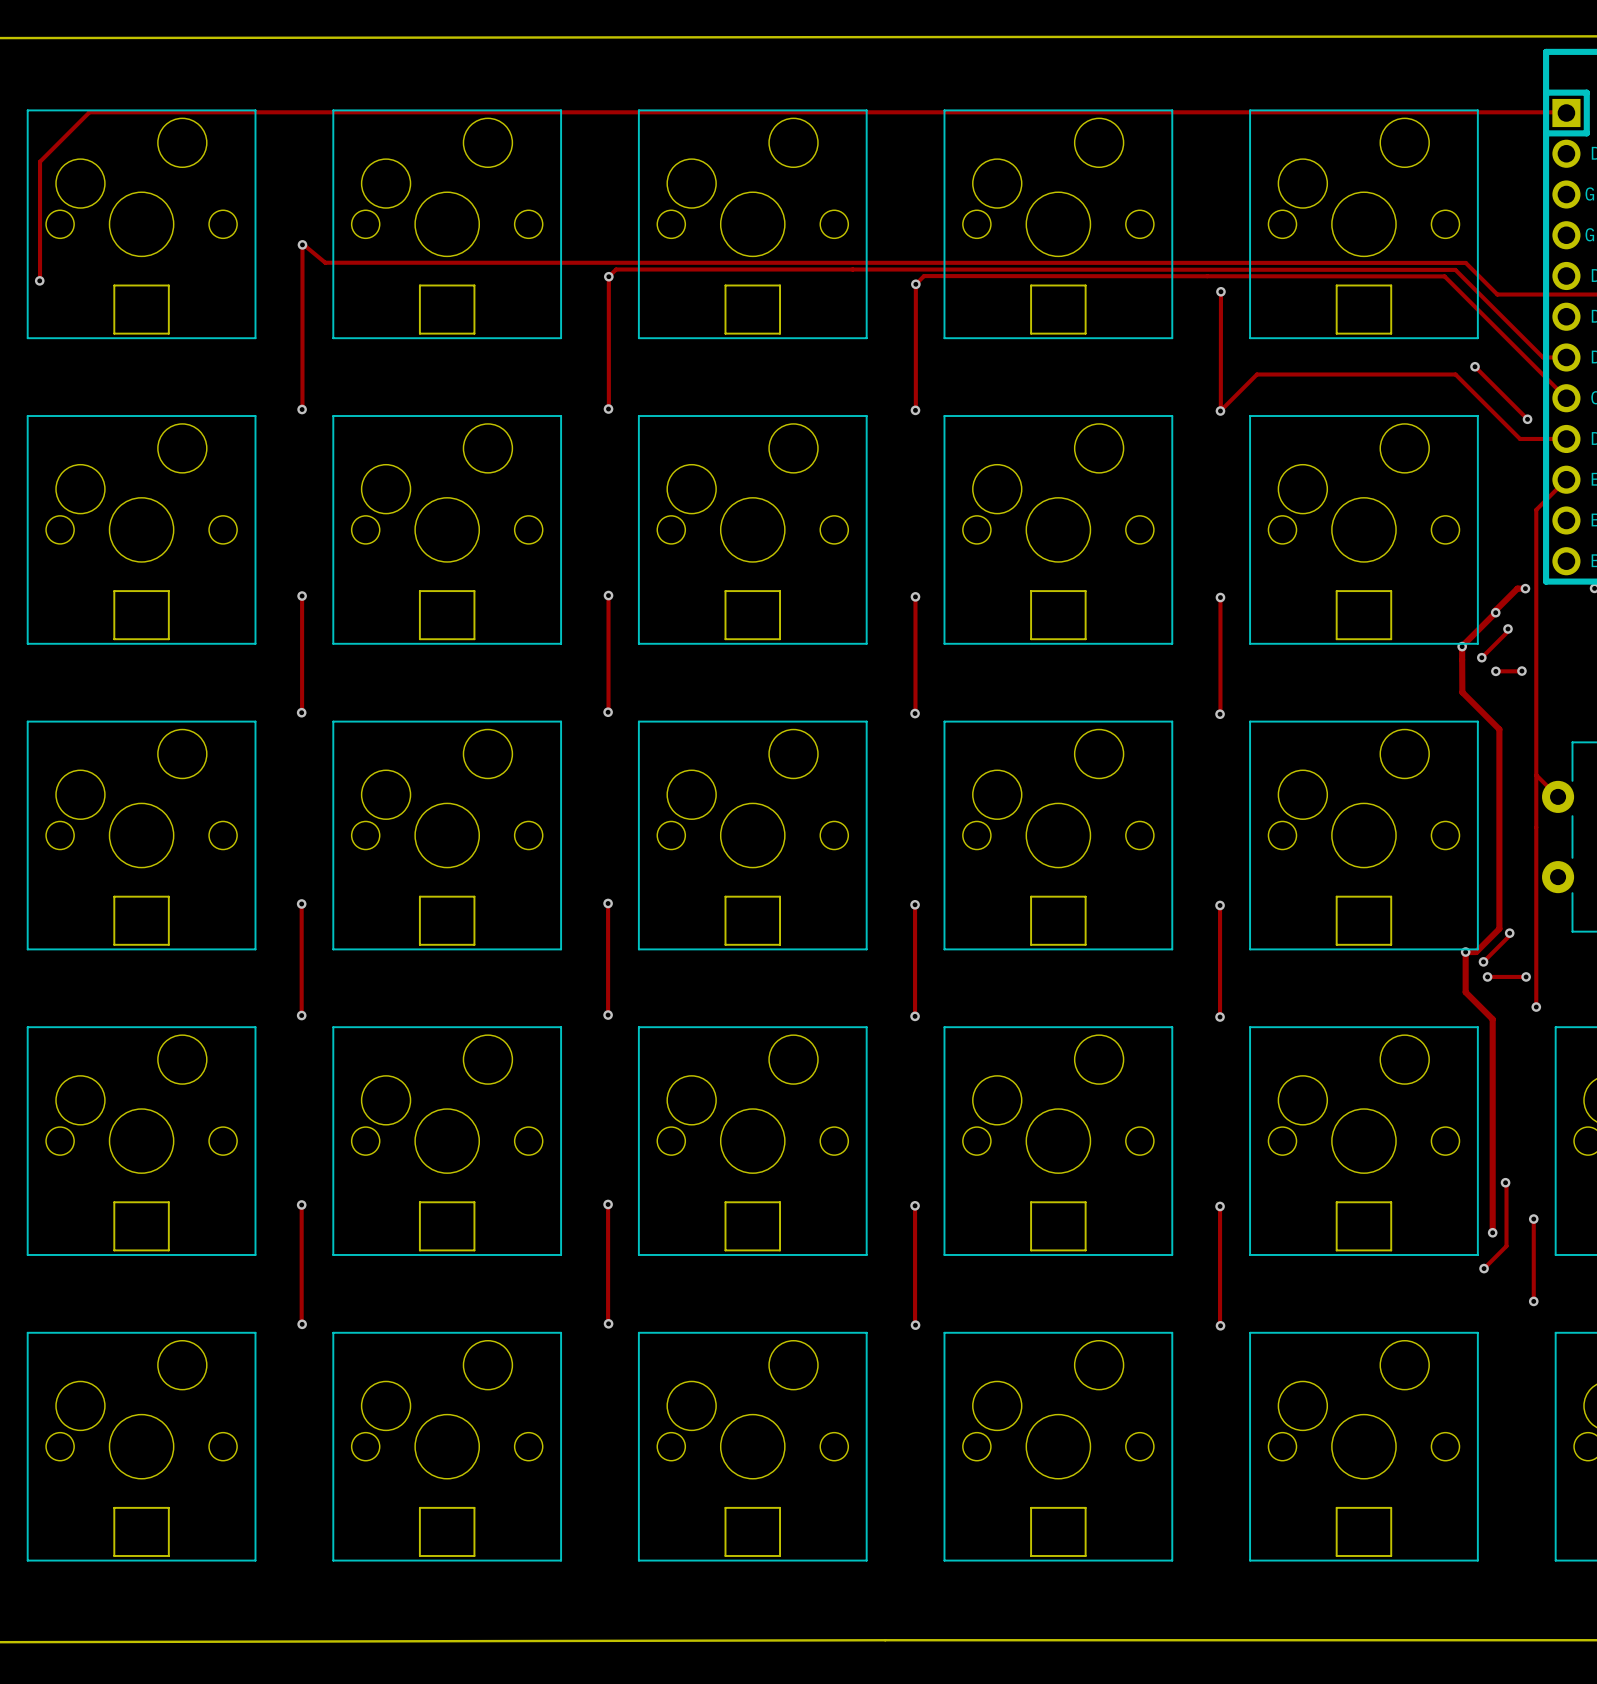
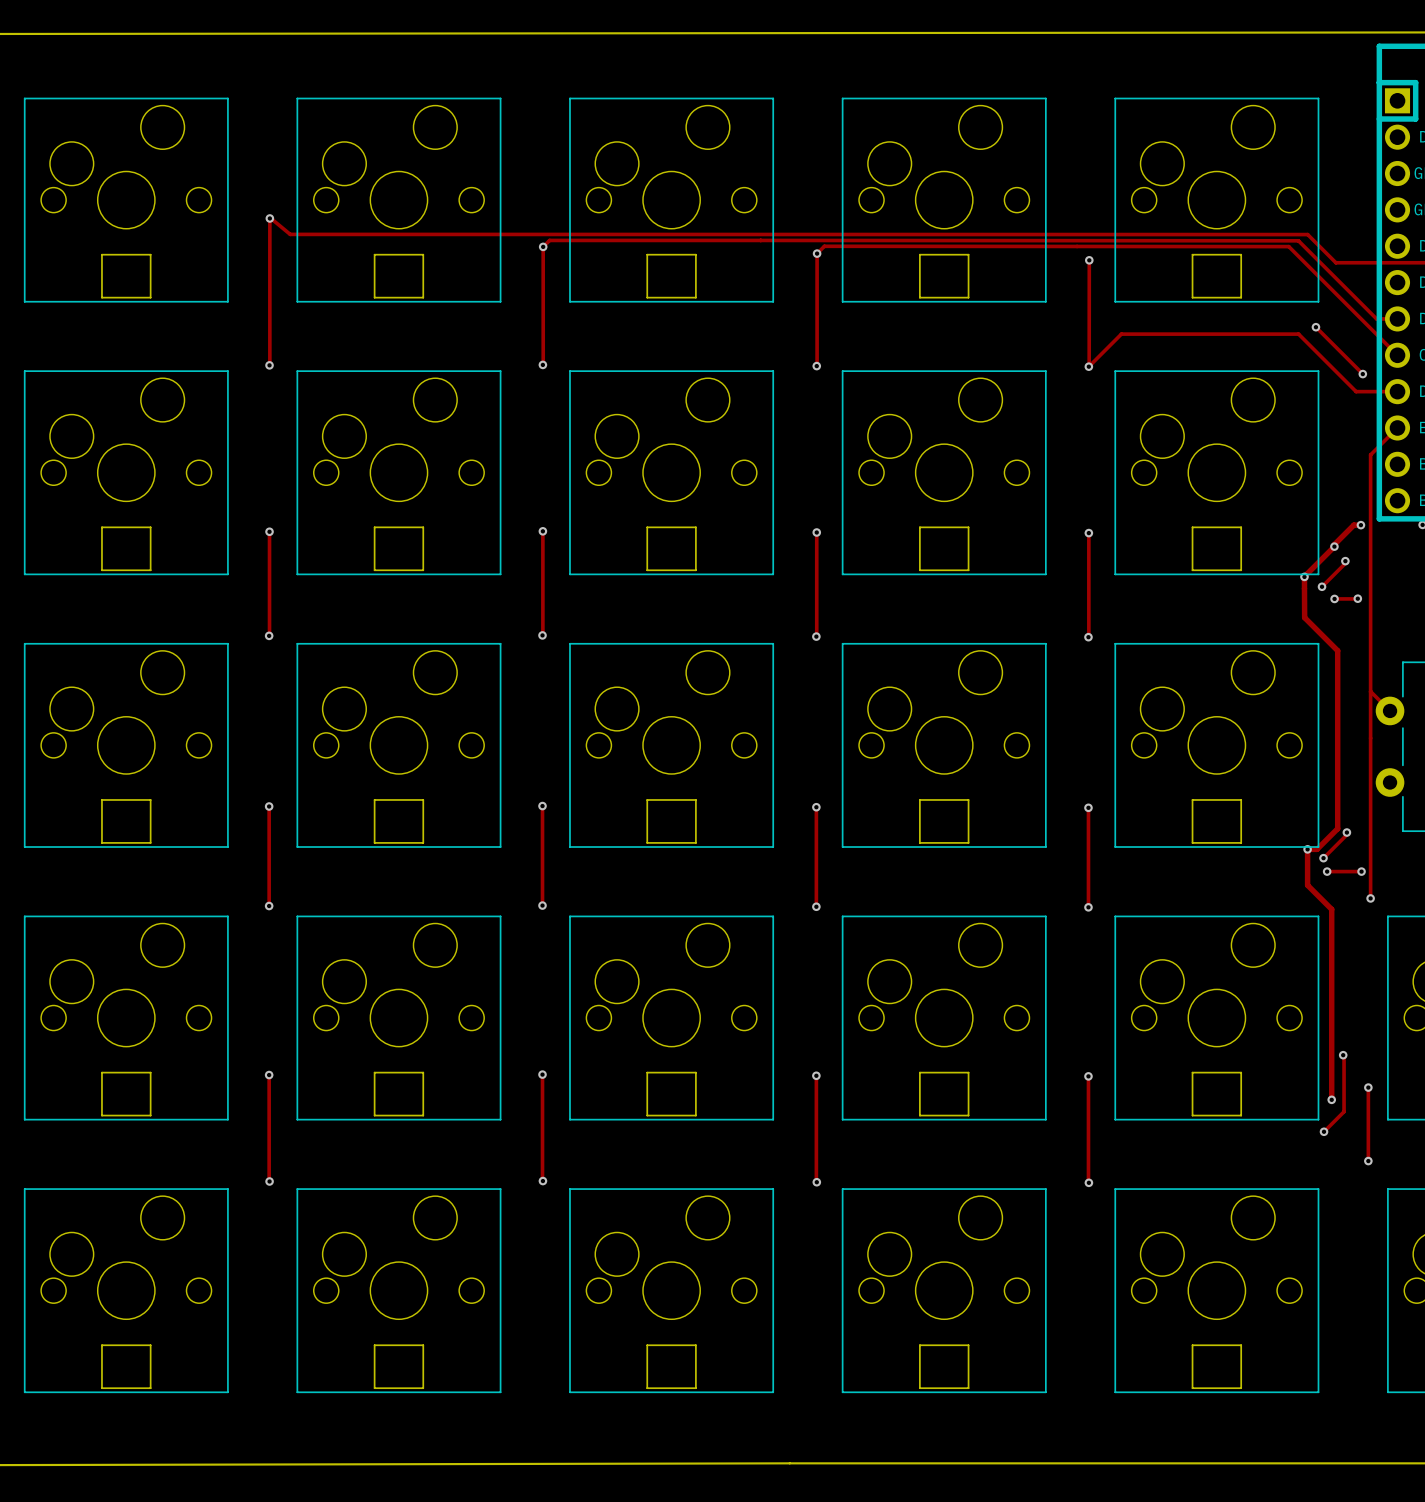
track: (1566, 113) (89, 112) (40, 161) (40, 281) -> none
via: (39, 280) -> none

